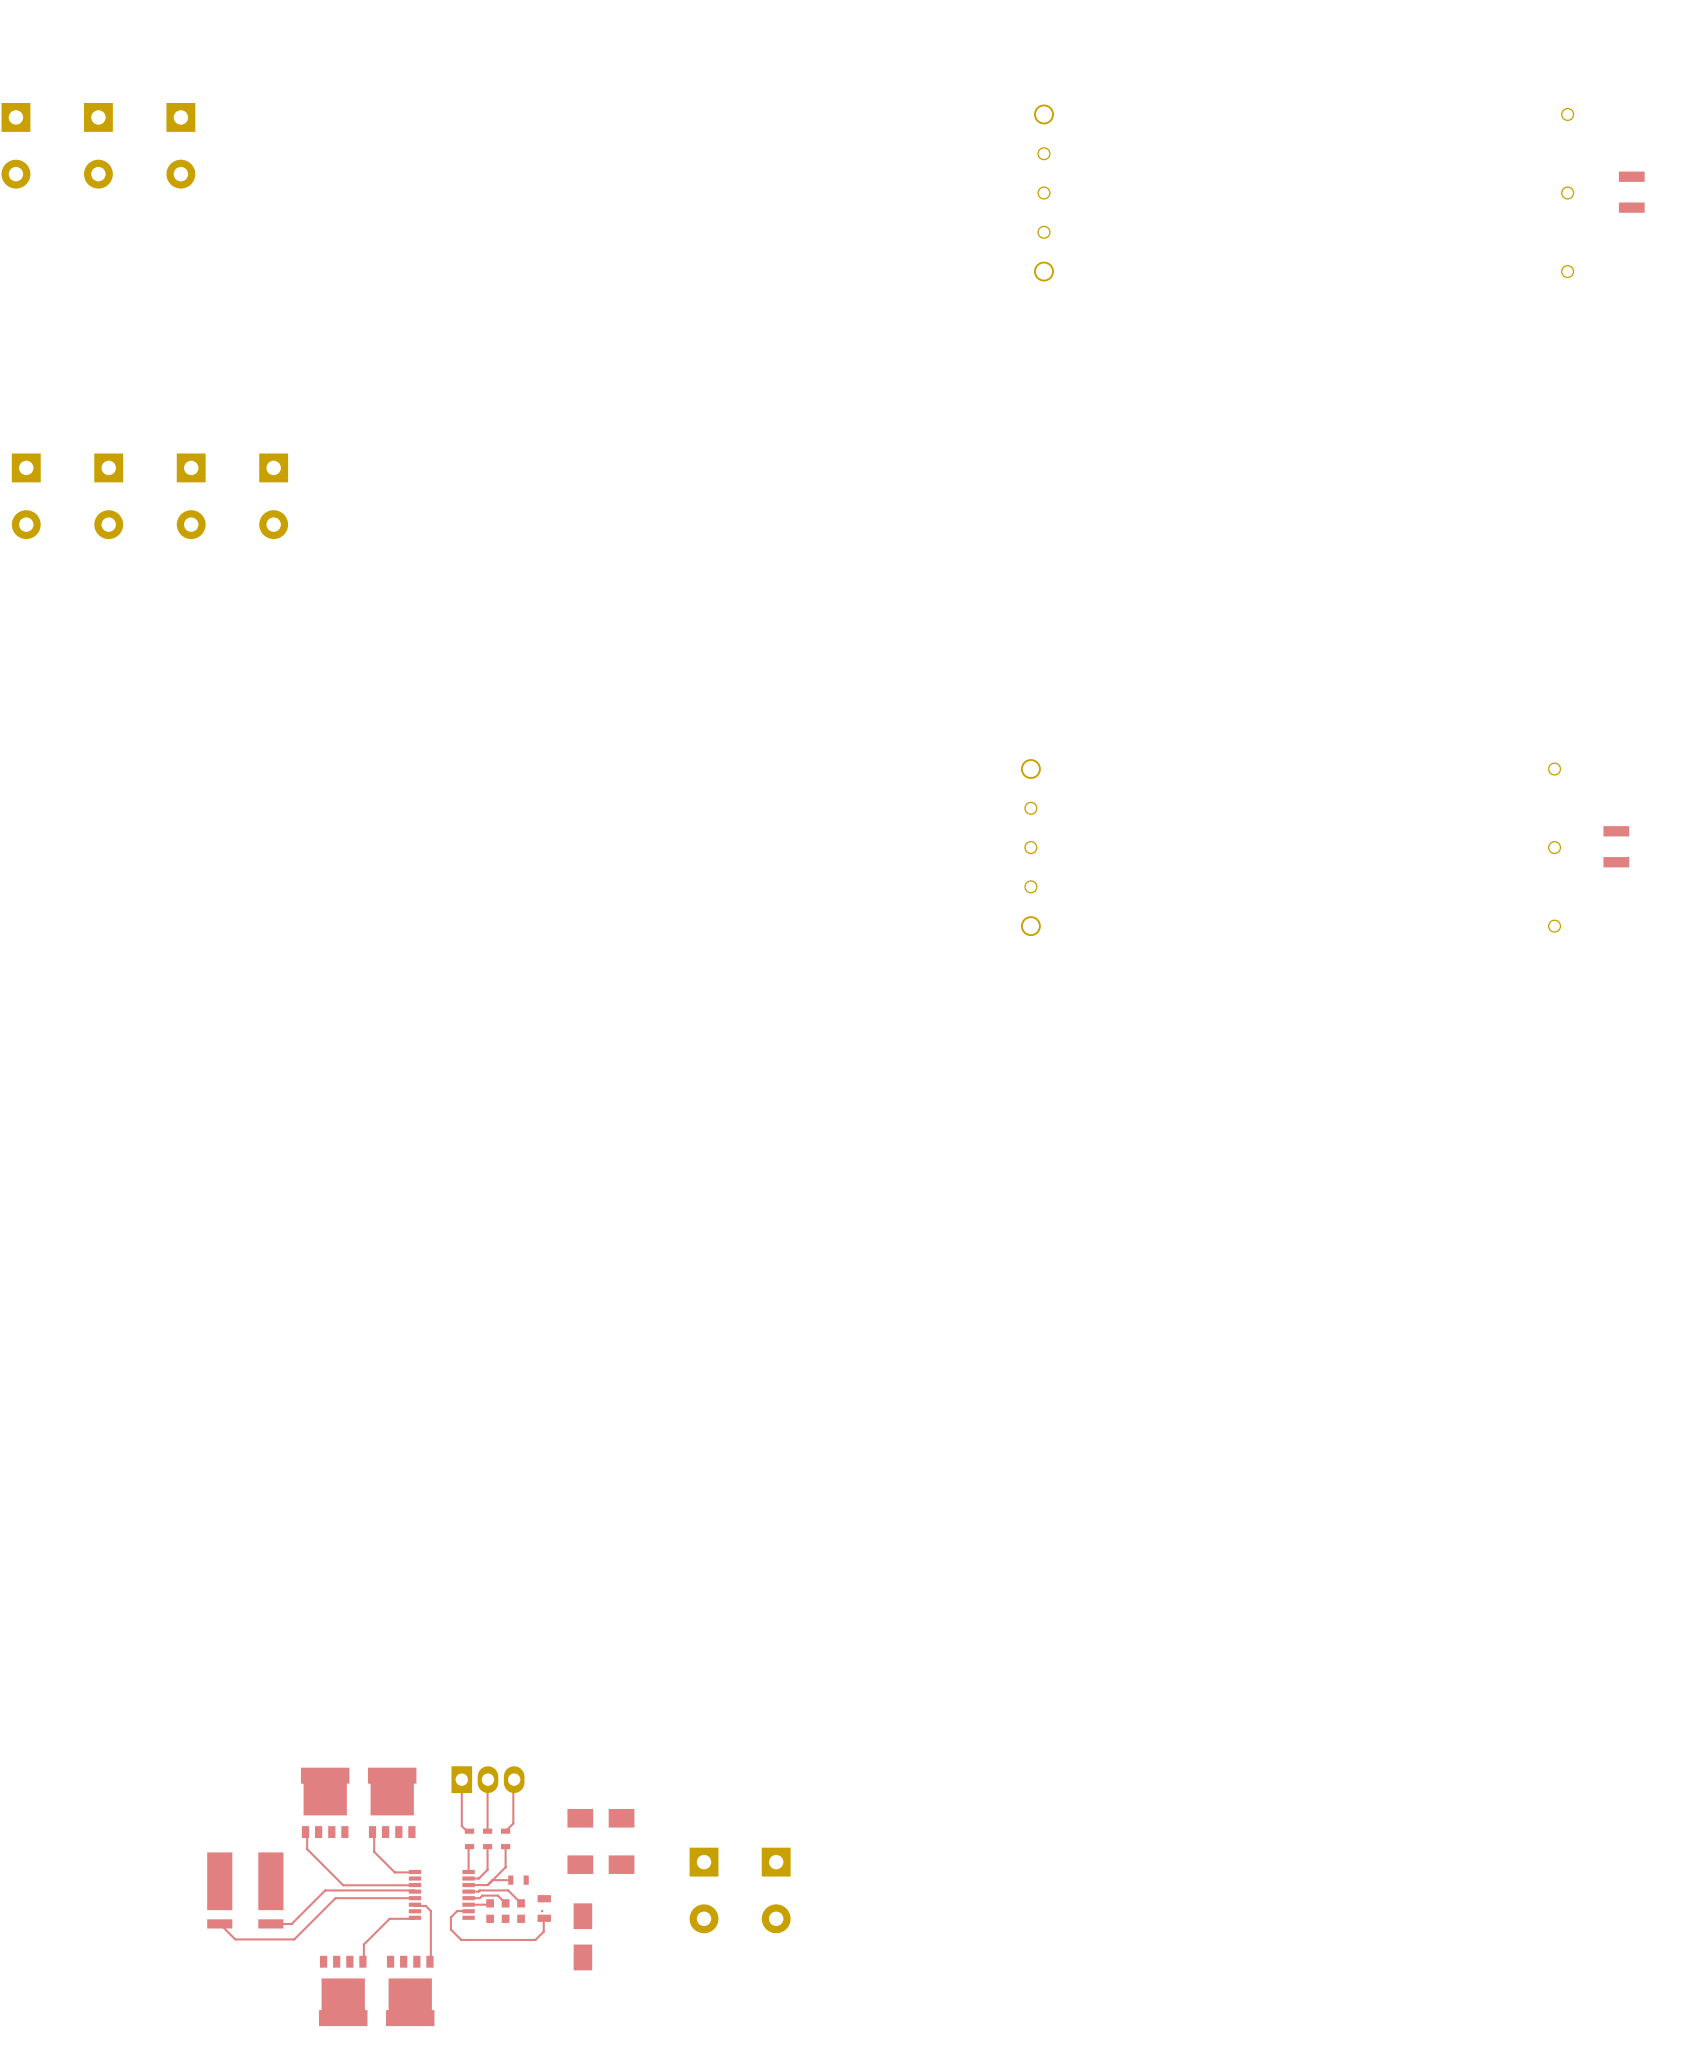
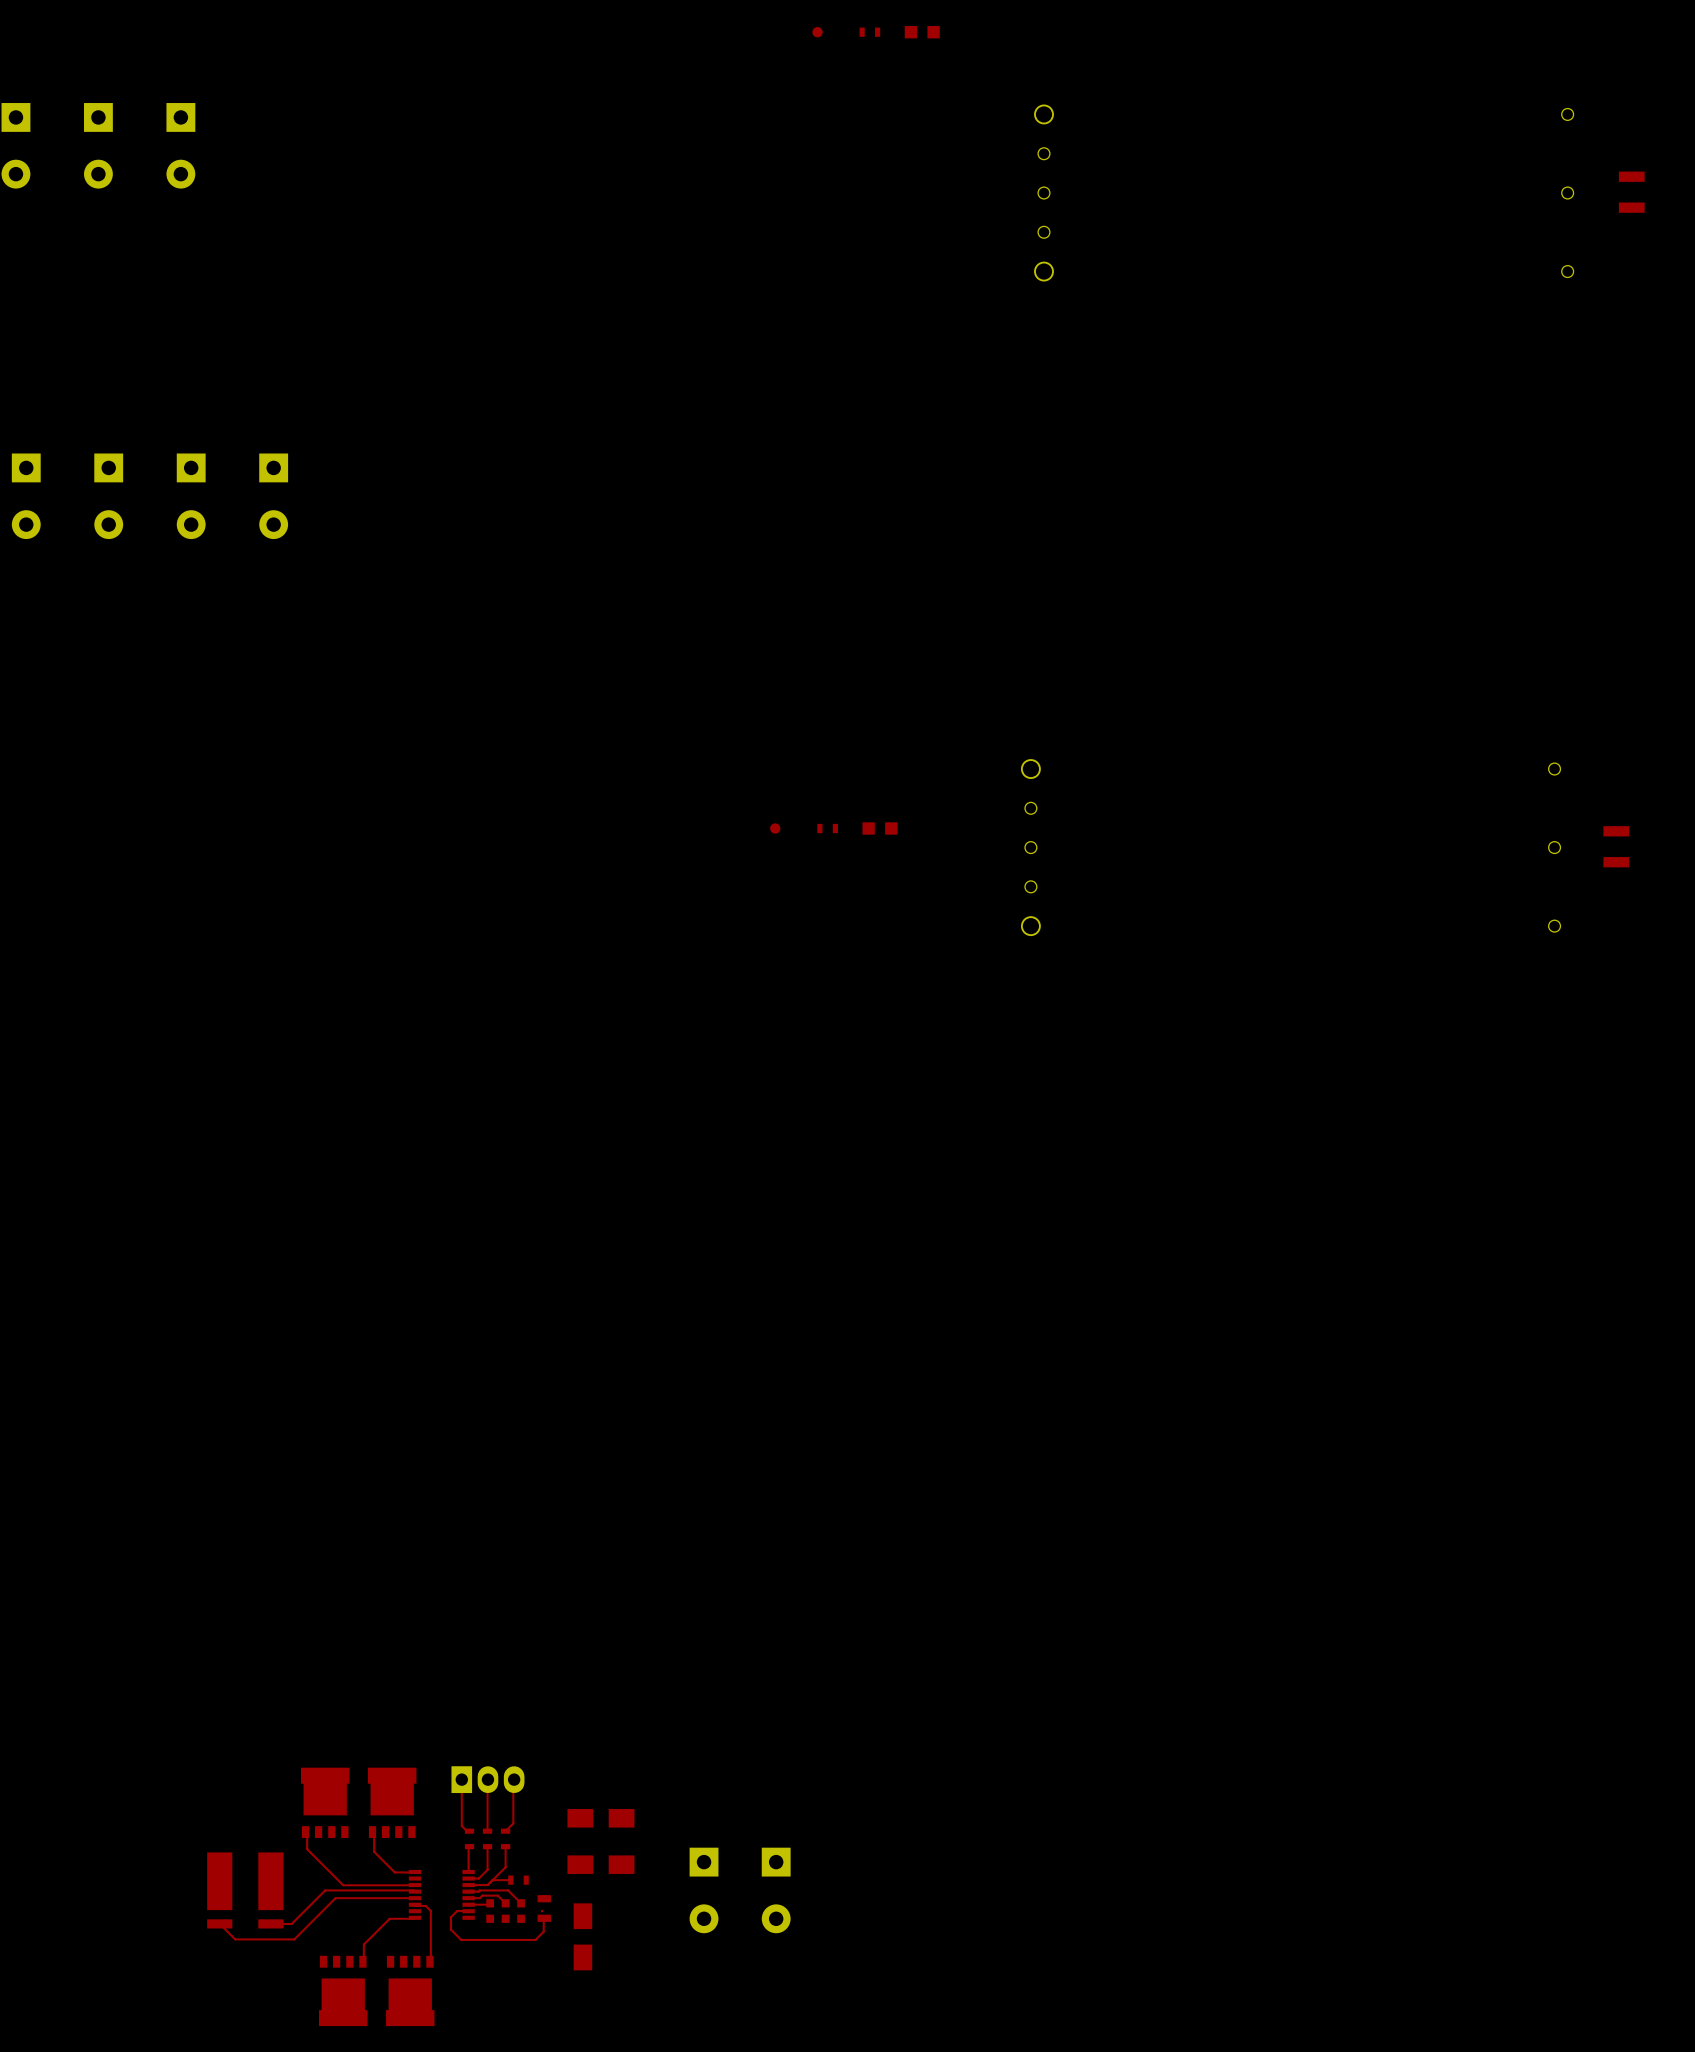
part: none -> (817, 32)
part: none -> (869, 32)
part: none -> (922, 32)
part: none -> (775, 828)
part: none -> (827, 828)
part: none -> (879, 828)

